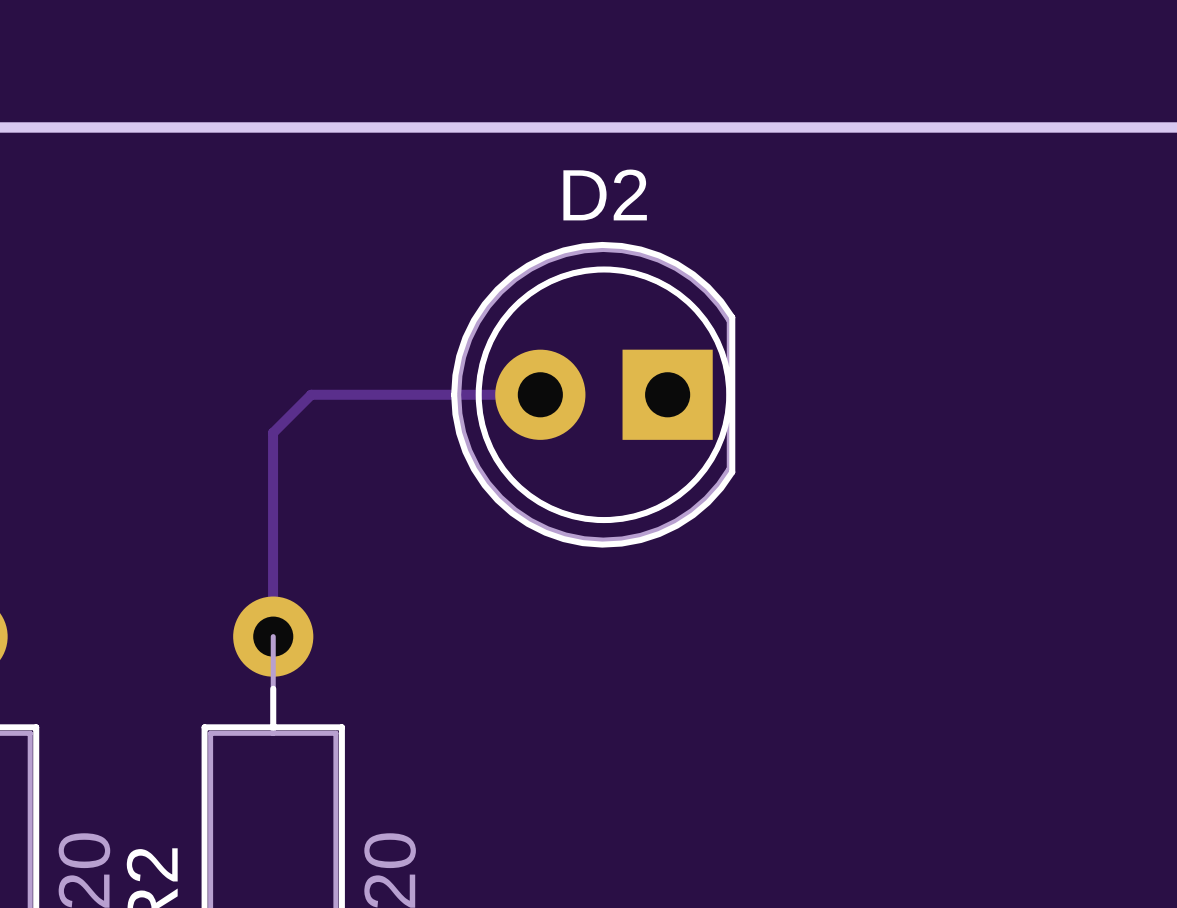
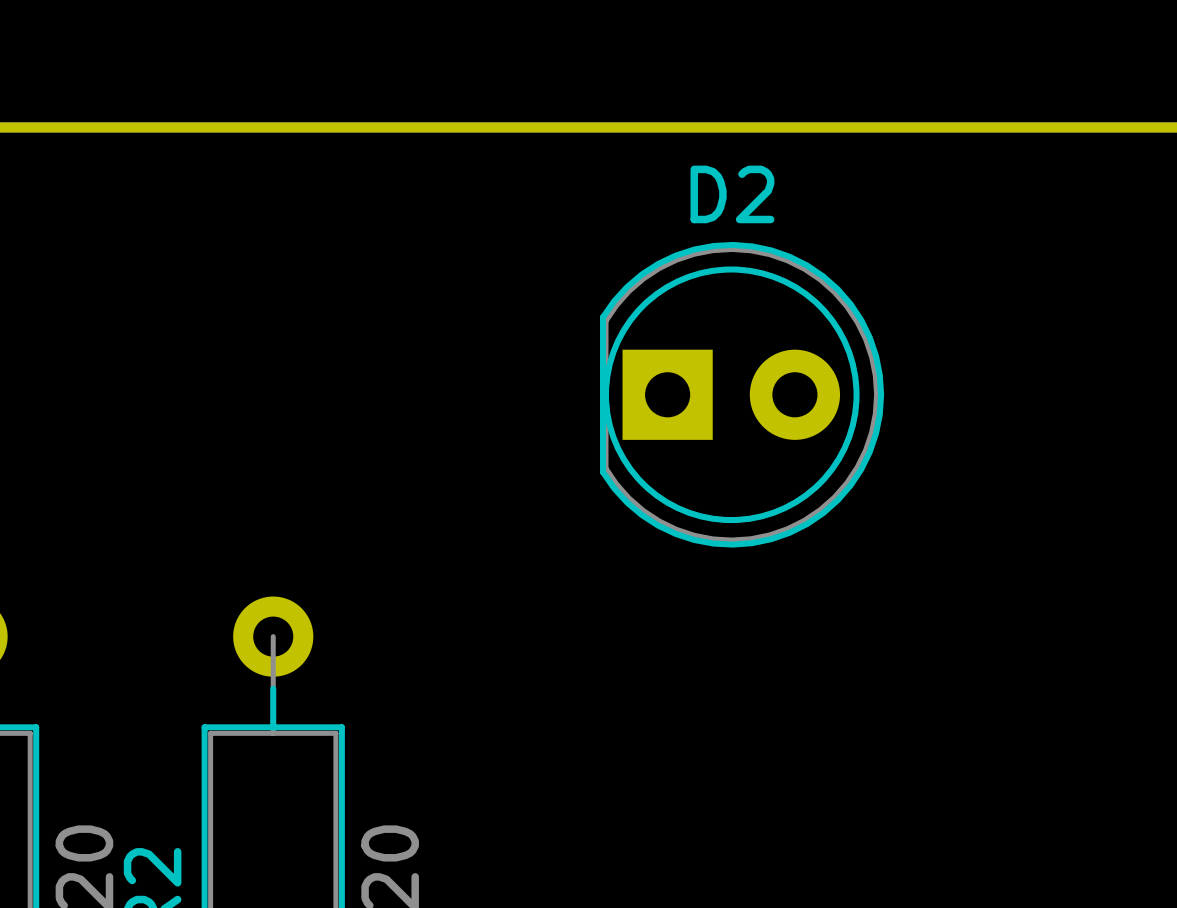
track: (540, 394) (311, 394) (273, 432) (273, 636) -> none
D2 rotation: 0° (593, 394) -> 180° (742, 394)

